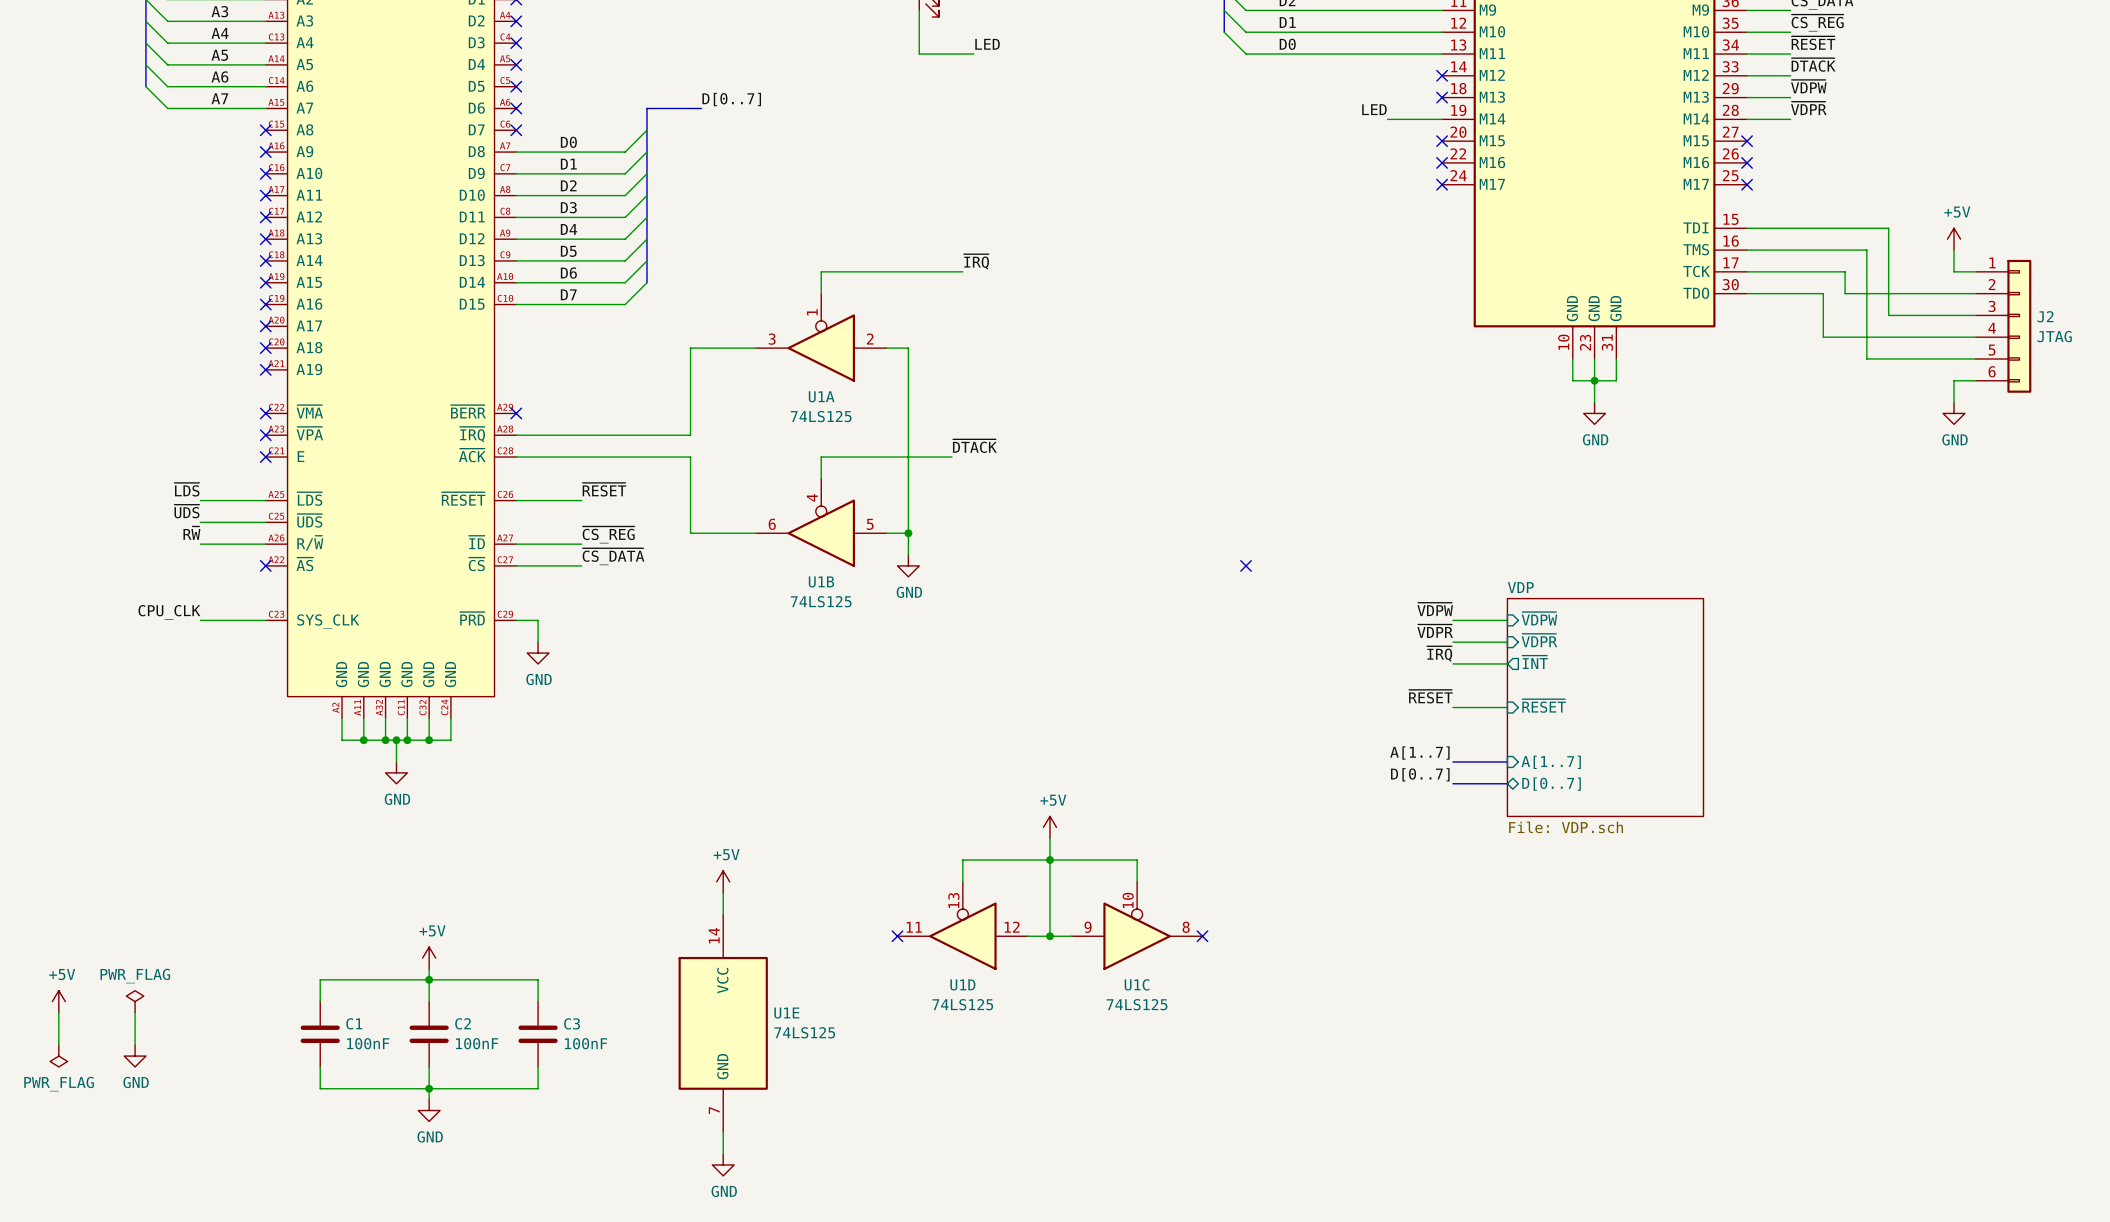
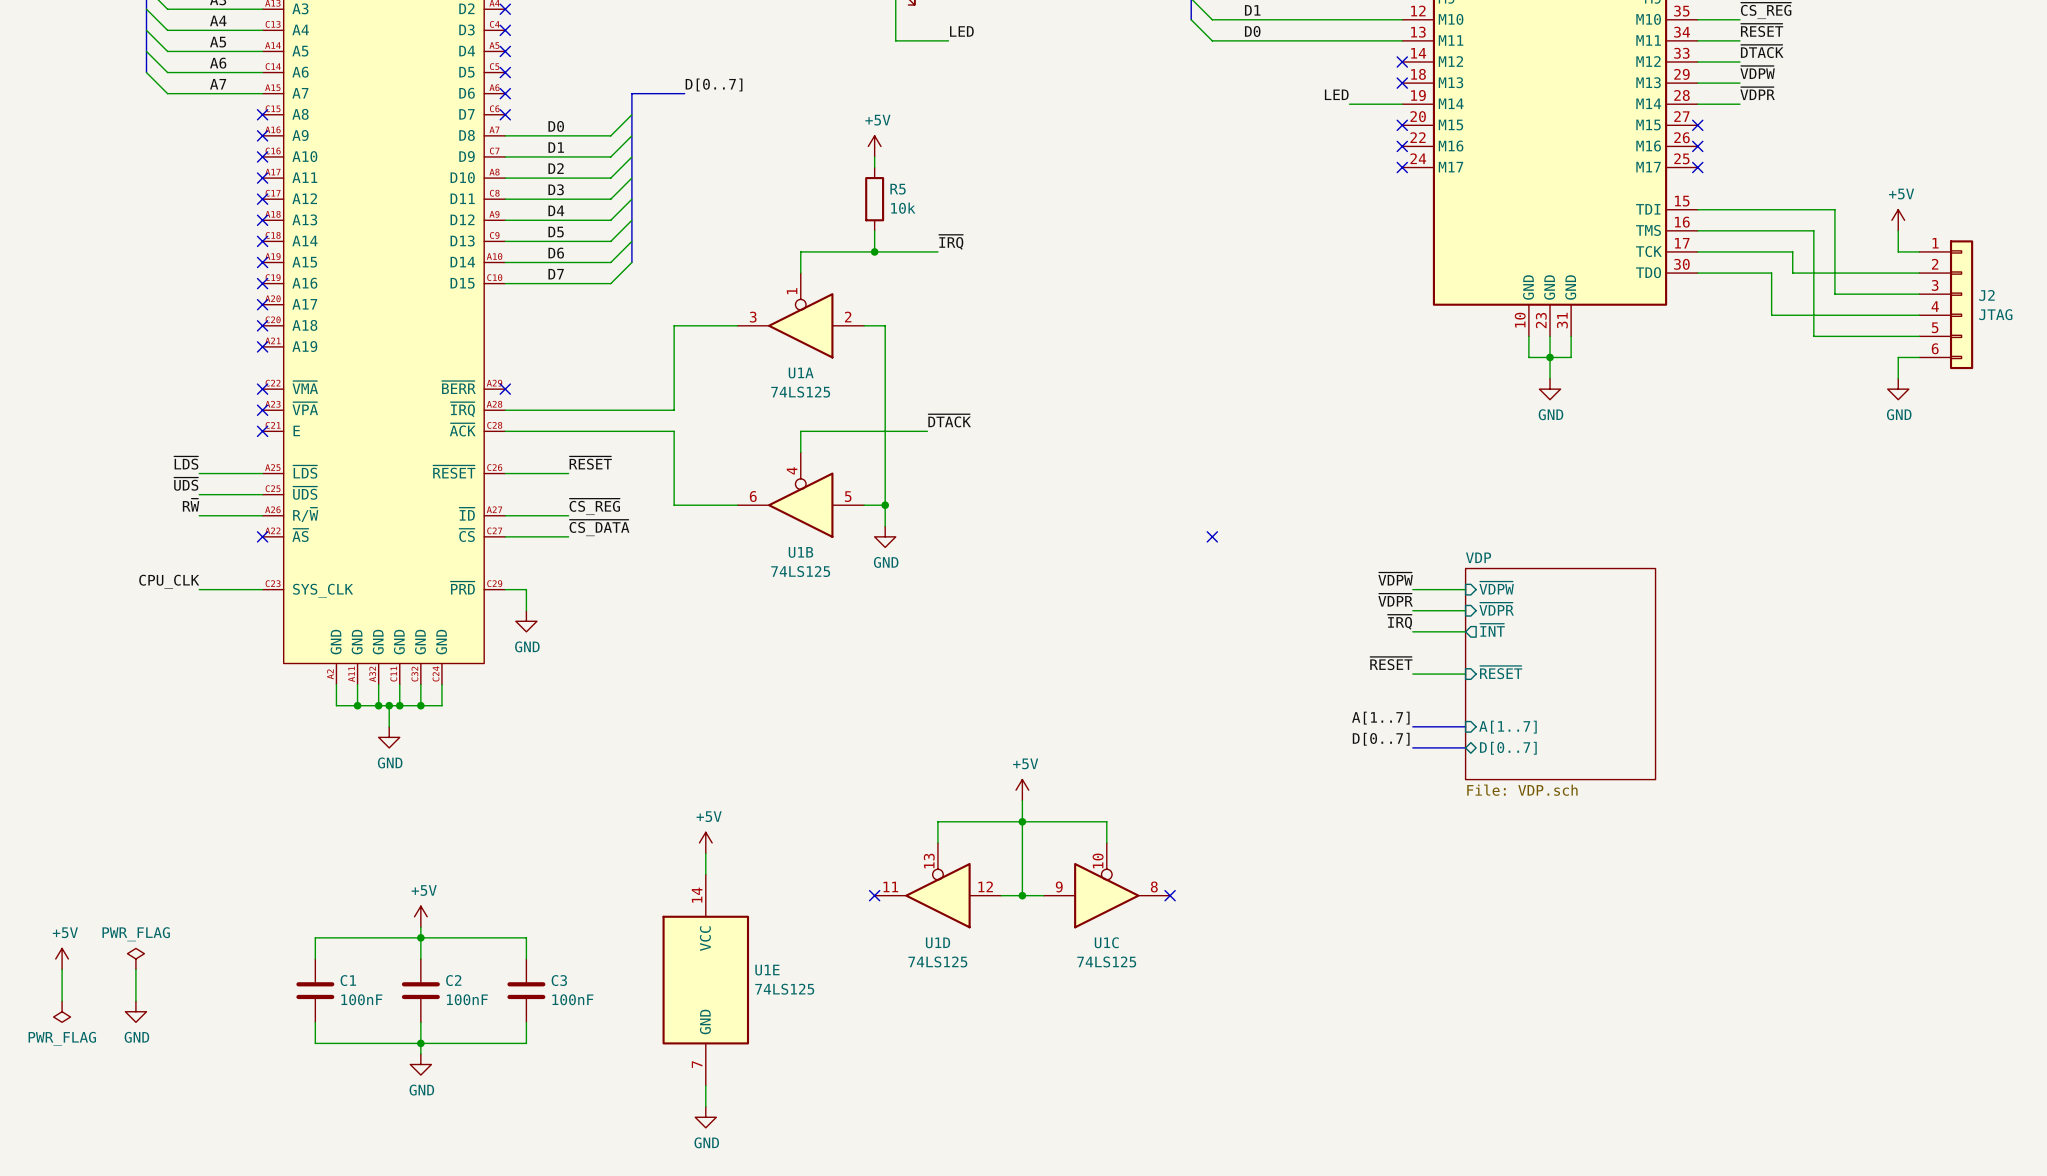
power symbol: none -> +5V (874, 146)
wire: none -> (874, 156) (874, 167)
R5: none -> 10k (874, 199)
wire: none -> (874, 230) (874, 251)
junction: none -> (874, 251)

